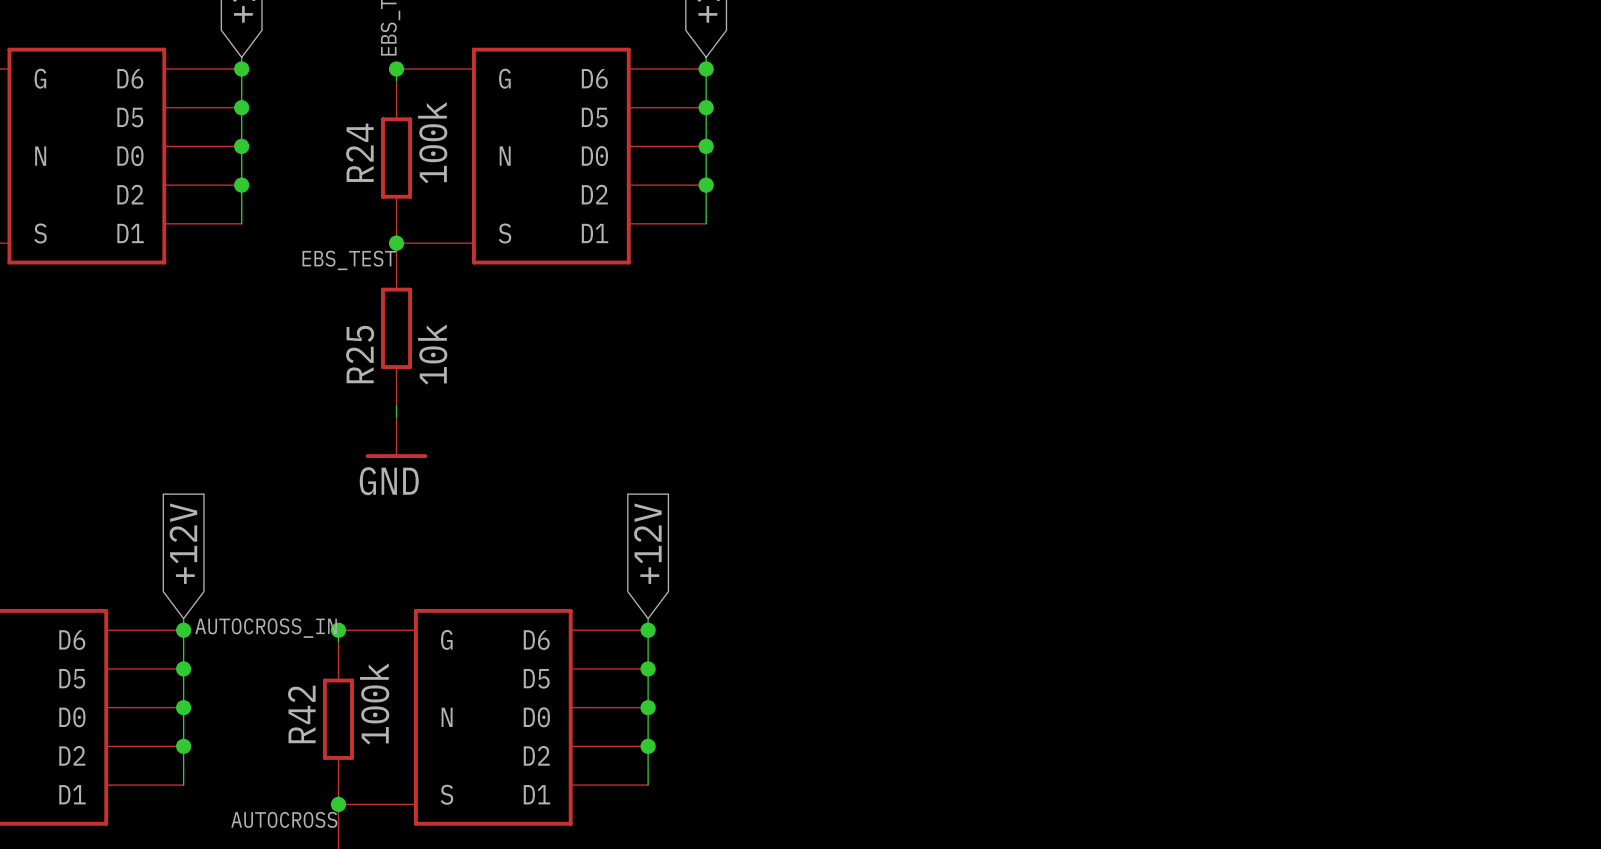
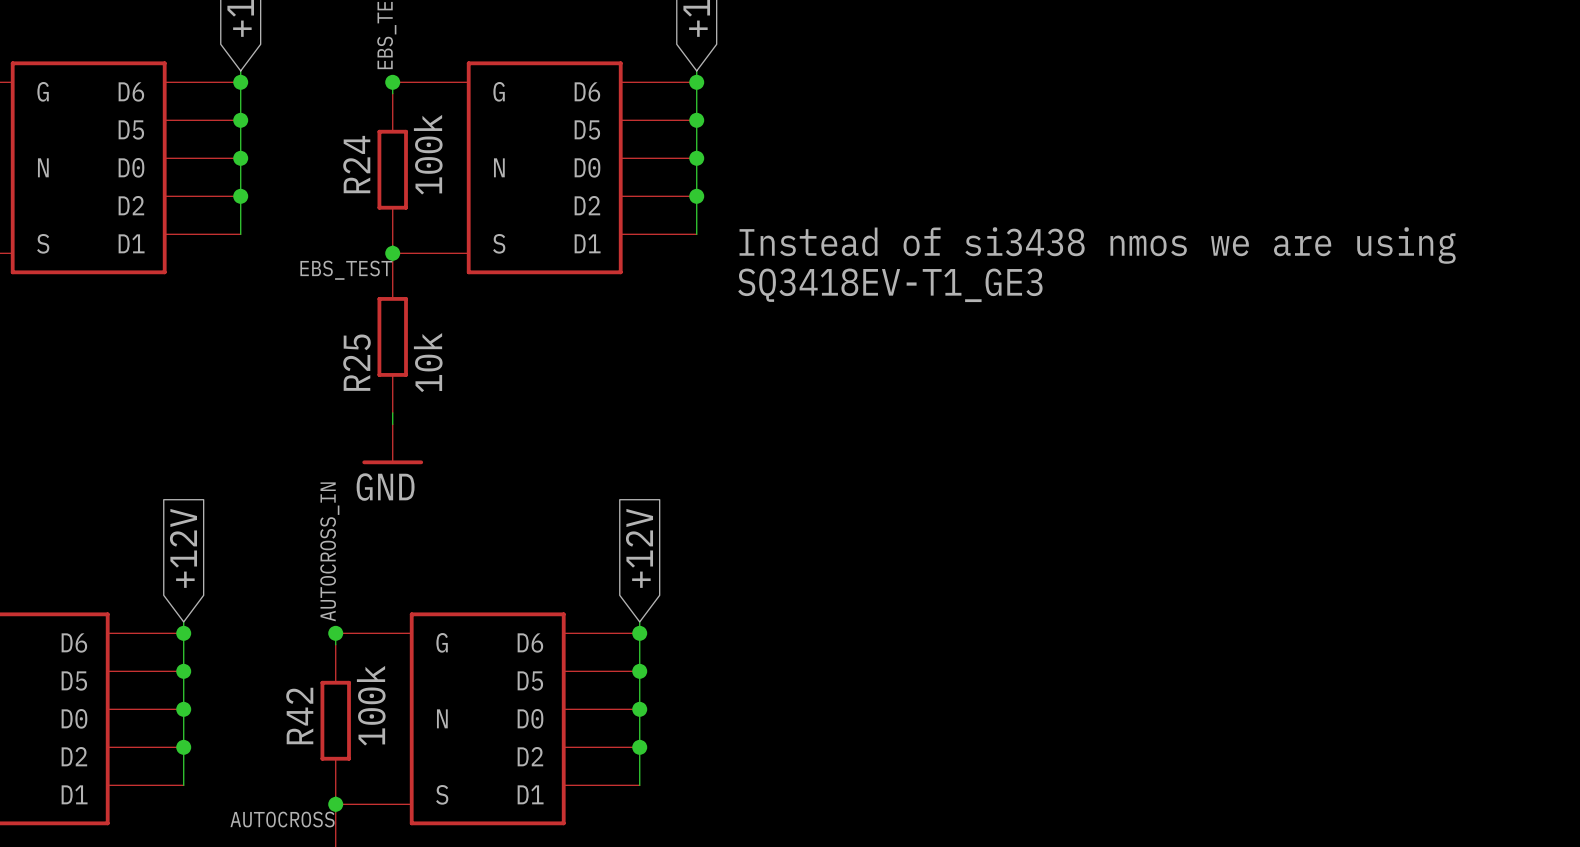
text: none -> Instead of si3438 nmos we are using (1097, 245)
text: none -> SQ3418EV-T1_GE3 (890, 285)
label rotation: 0° (266, 628) -> 90° counterclockwise (329, 551)

